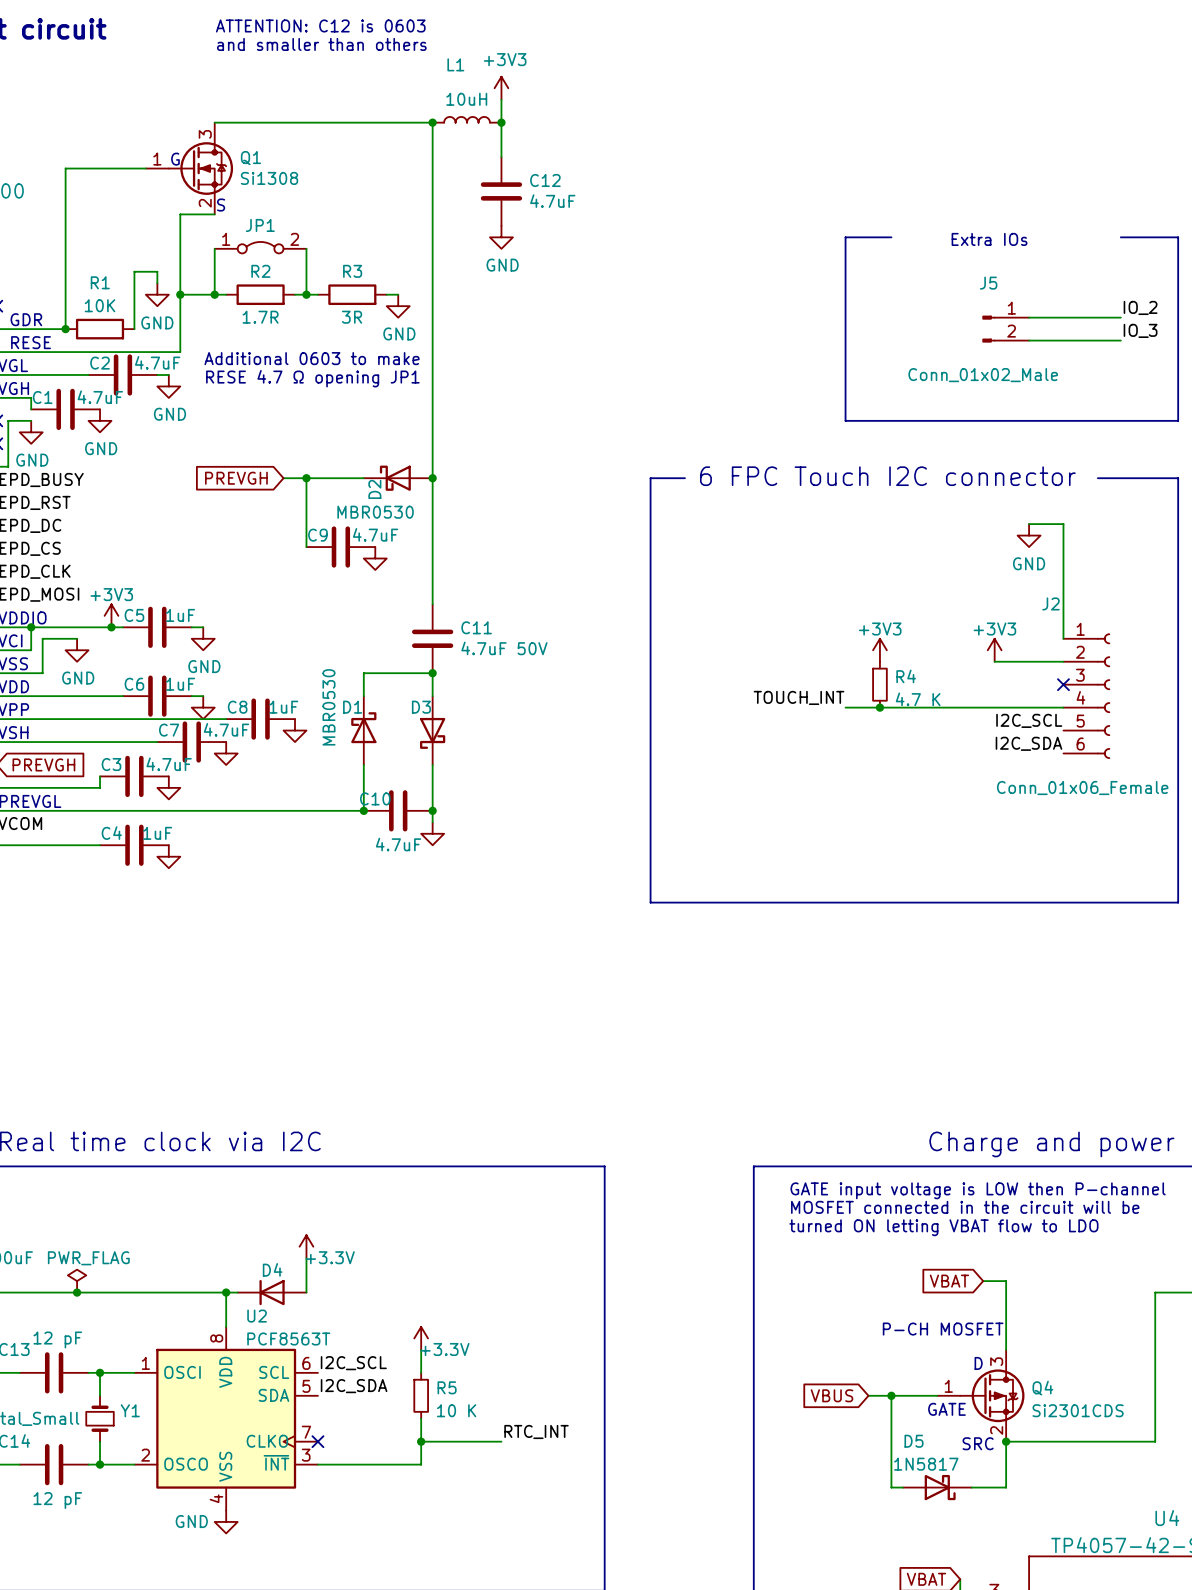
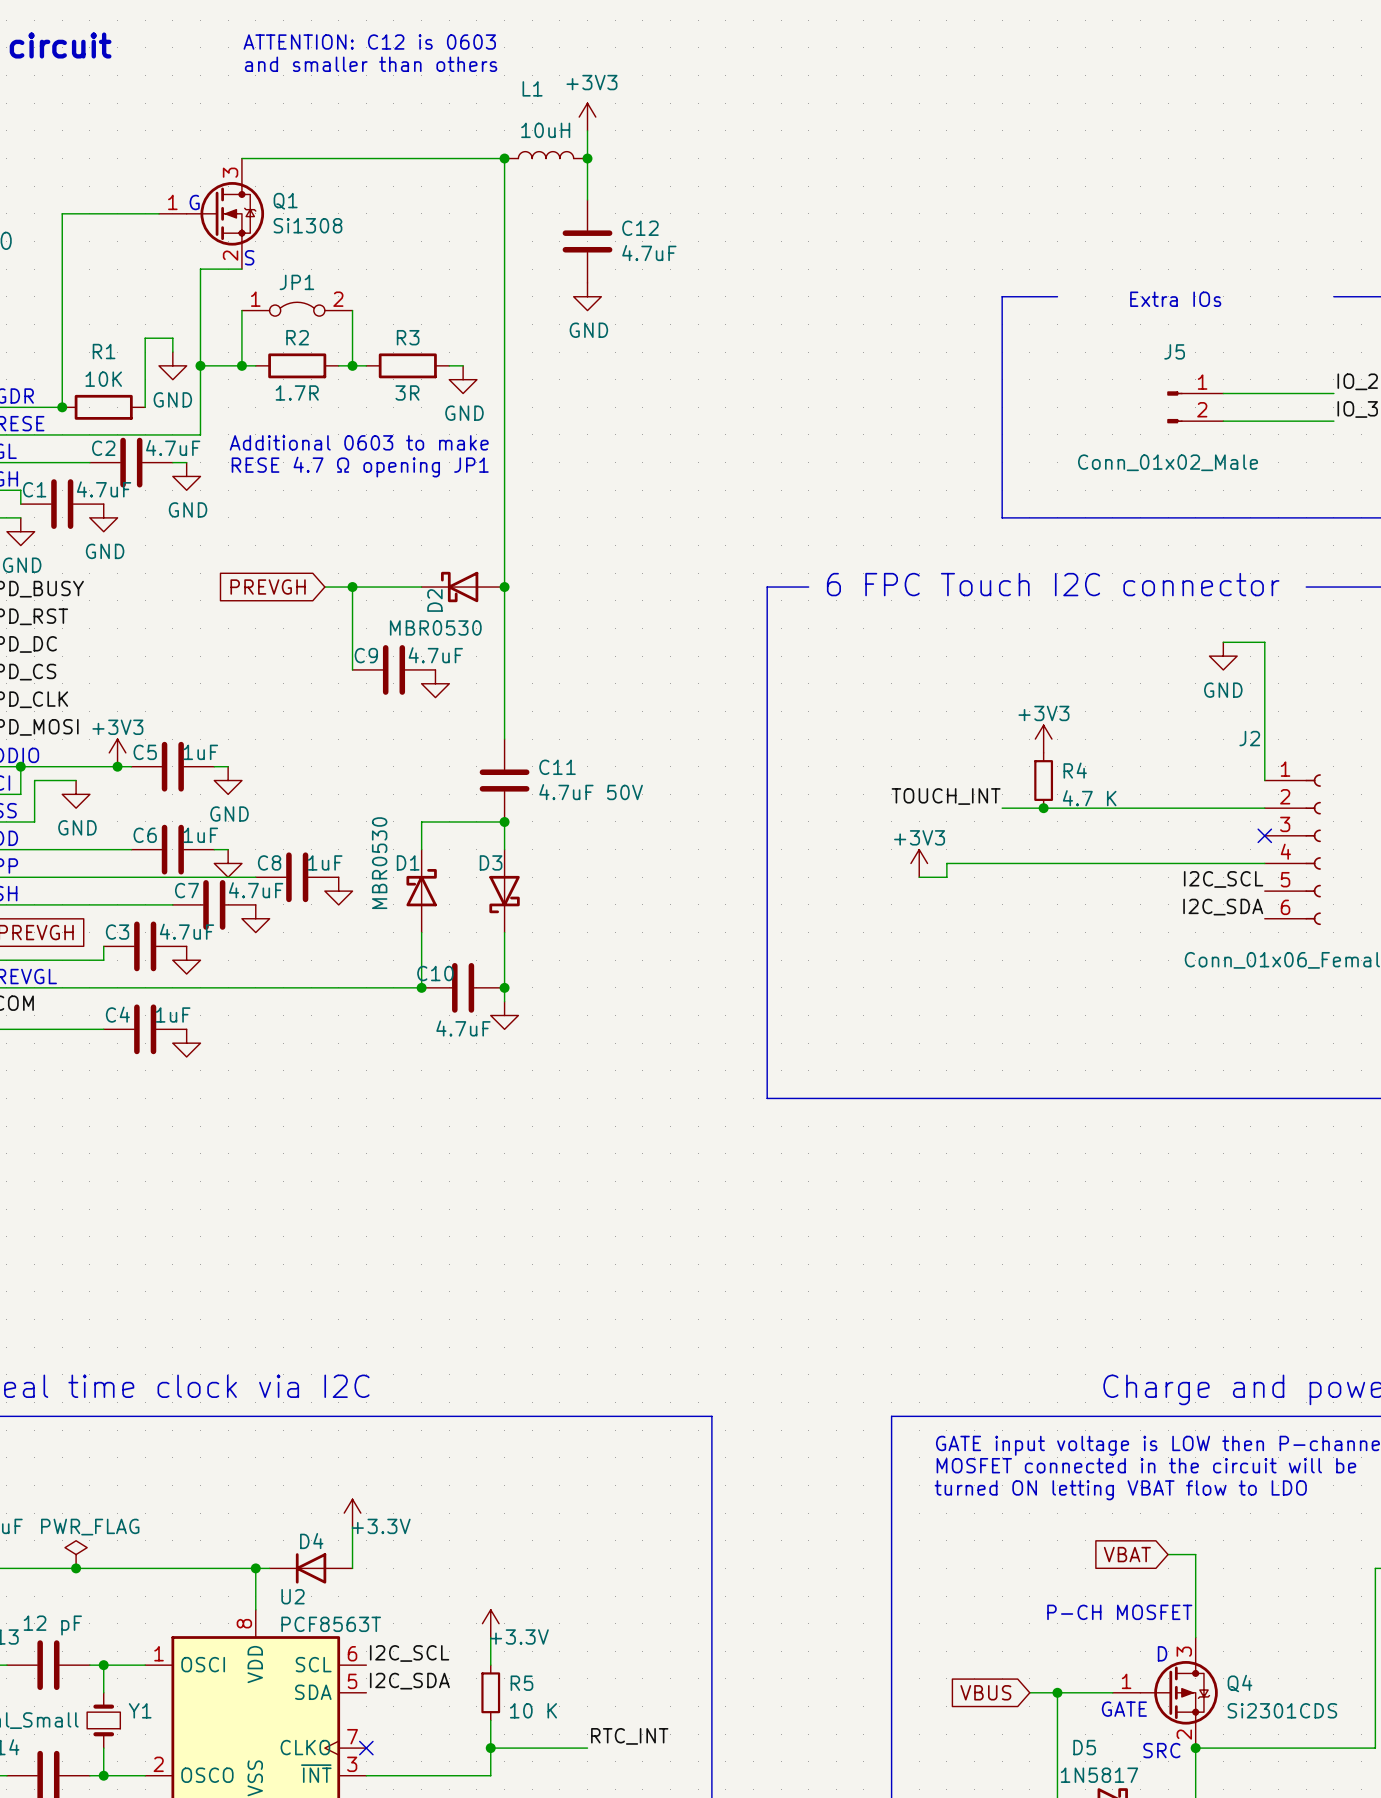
power symbol position: +3V3 (879, 650) -> +3V3 (1043, 739)
power symbol: +3V3 (994, 650) -> none
wire: none -> (1002, 808) (1181, 808)
R4 position: (879, 684) -> (1043, 780)
label position: TOUCH_INT (799, 697) -> TOUCH_INT (946, 796)
power symbol: none -> +3V3 (919, 863)
wire: none -> (1002, 863) (946, 863) (946, 877) (919, 877)
junction position: (879, 707) -> (1043, 808)

